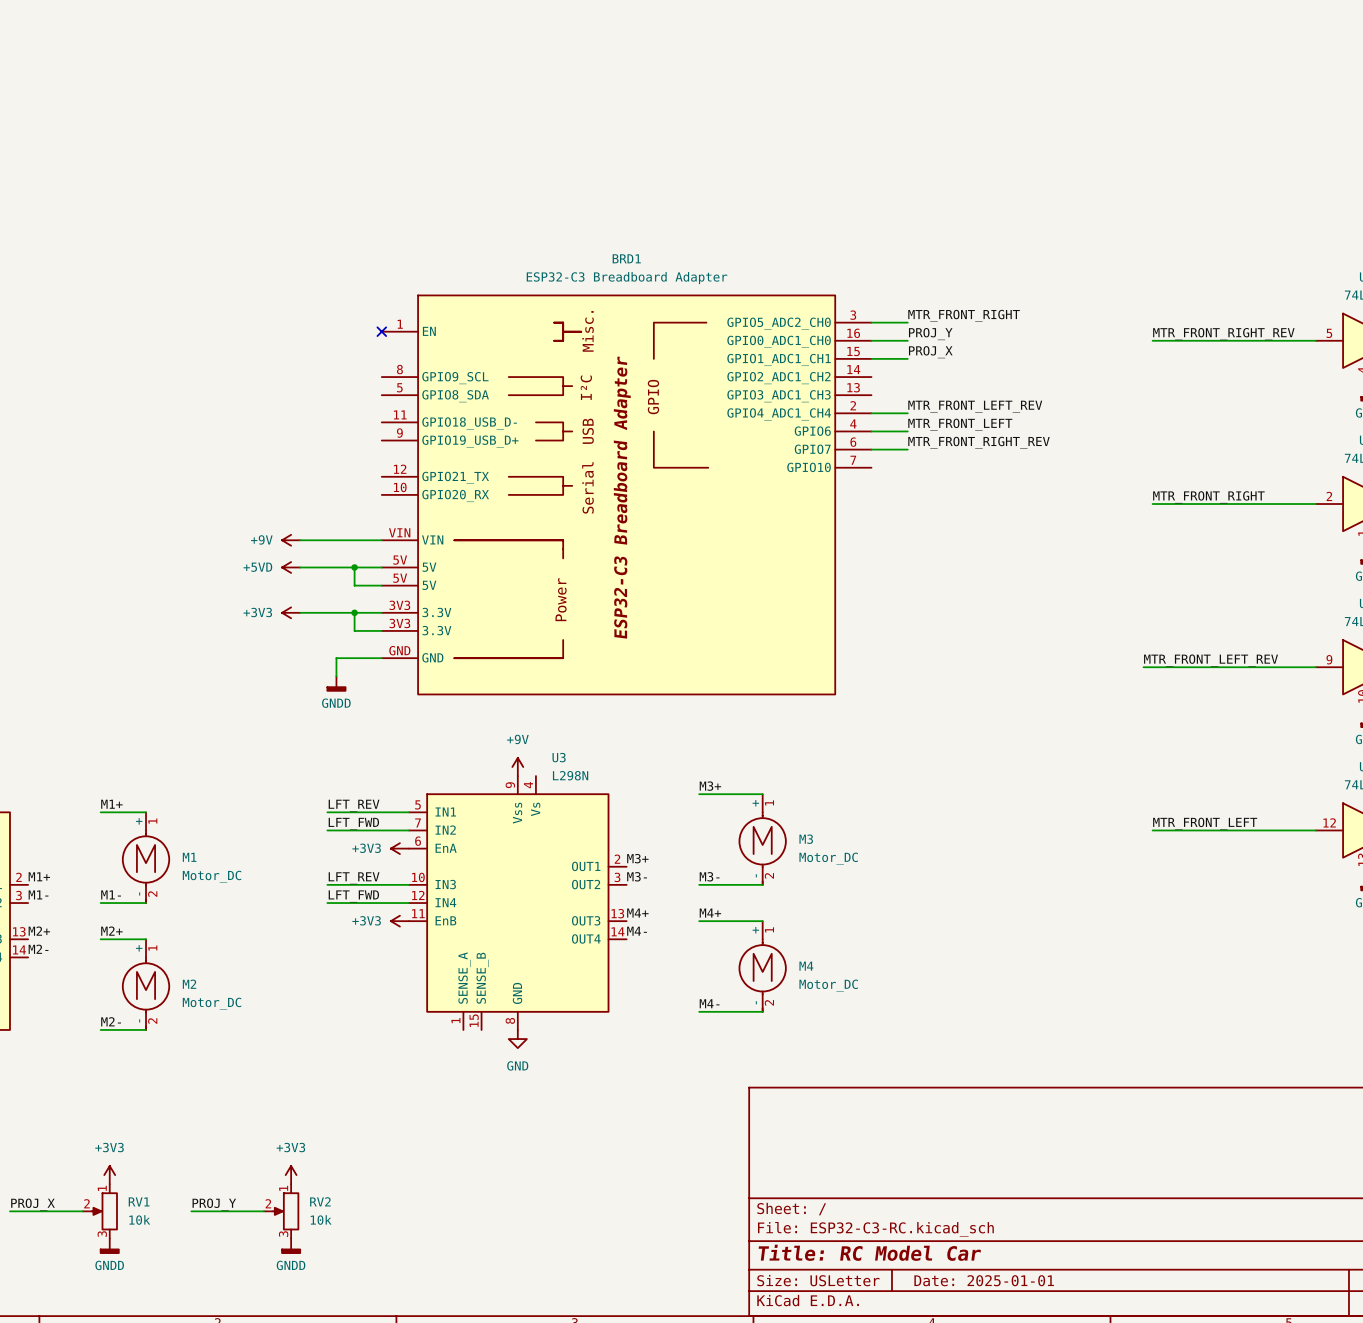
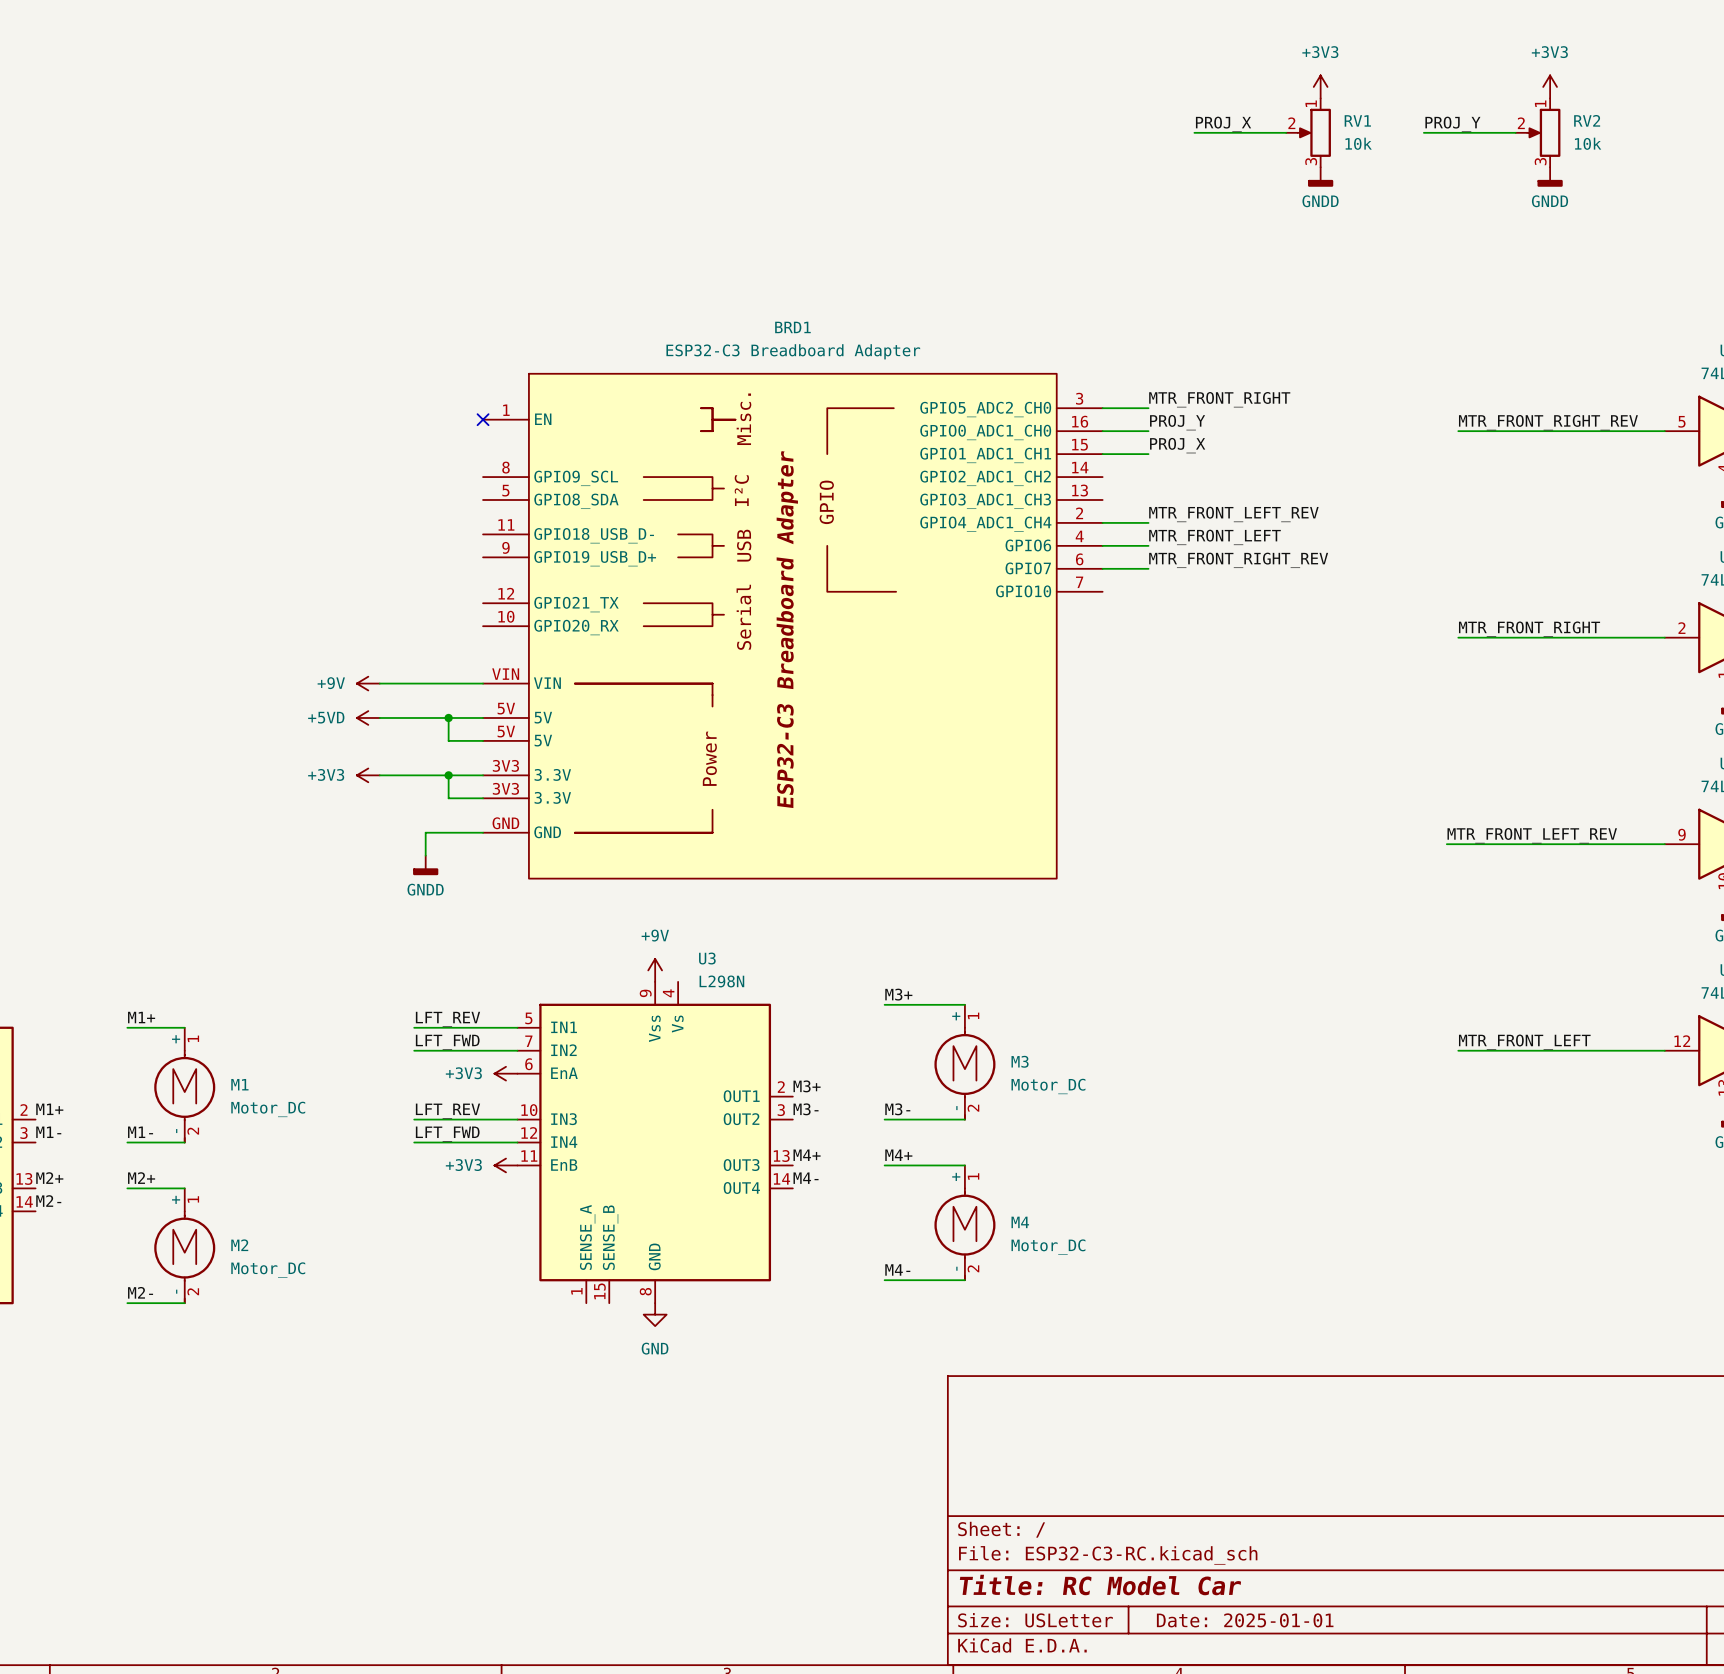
power symbol: none -> +3V3 (1320, 86)
power symbol: none -> +3V3 (1550, 86)
label: none -> PROJ_X (1223, 124)
label: none -> PROJ_Y (1452, 124)
wire: none -> (1194, 132) (1286, 132)
wire: none -> (1423, 132) (1515, 132)
power symbol: none -> GNDD (1320, 177)
power symbol: none -> GNDD (1550, 177)
power symbol: +3V3 (109, 1175) -> none
power symbol: +3V3 (291, 1175) -> none
label: PROJ_X (32, 1204) -> none
label: PROJ_Y (214, 1204) -> none
wire: (9, 1211) (82, 1211) -> none
RV1 position: (100, 1211) -> (1308, 132)
wire: (191, 1211) (263, 1211) -> none
RV2 position: (281, 1211) -> (1538, 132)
power symbol: GNDD (109, 1246) -> none
power symbol: GNDD (291, 1246) -> none

